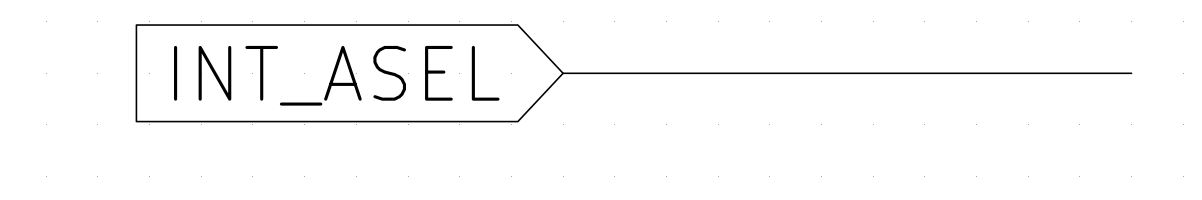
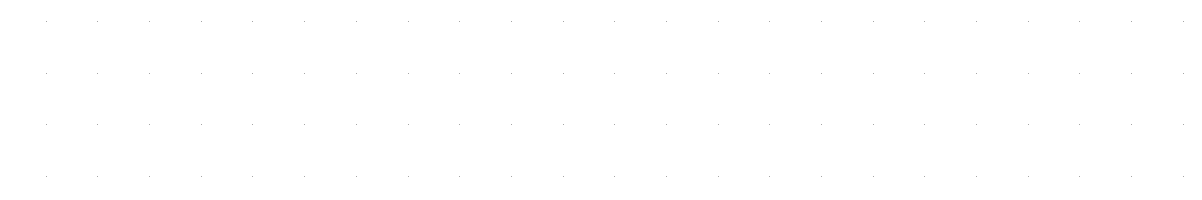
wire: (563, 73) (1131, 73) -> none
global label: INT_ASEL (336, 75) -> none

